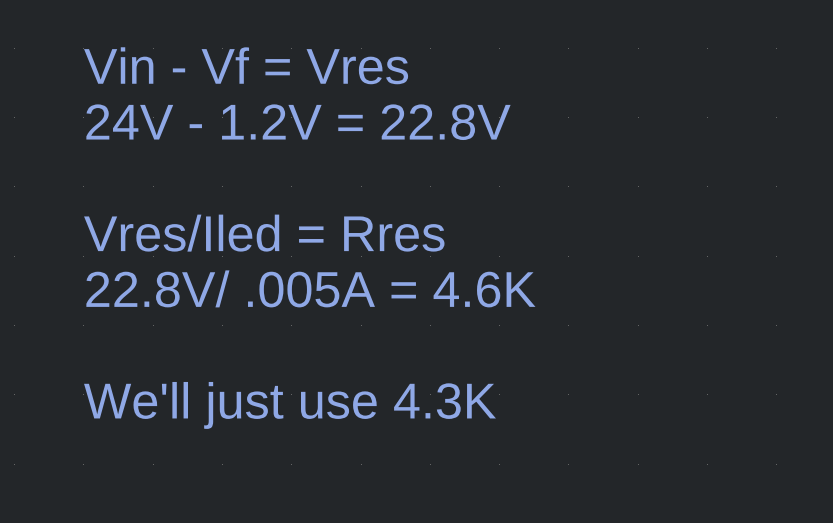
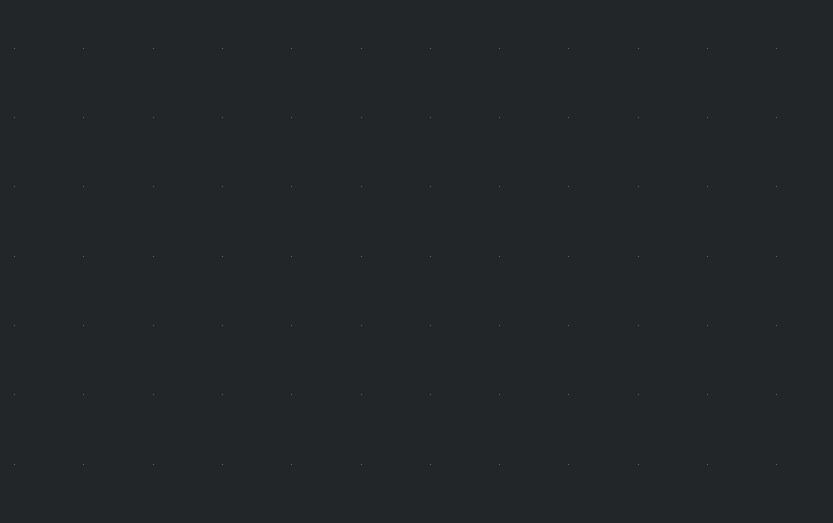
text: Vin - Vf = Vres (246, 65) -> none
text: 24V - 1.2V = 22.8V (298, 122) -> none
text: Vres/Iled = Rres (264, 233) -> none
text: 22.8V/ .005A = 4.6K (310, 288) -> none
text: We'll just use 4.3K (290, 405) -> none

